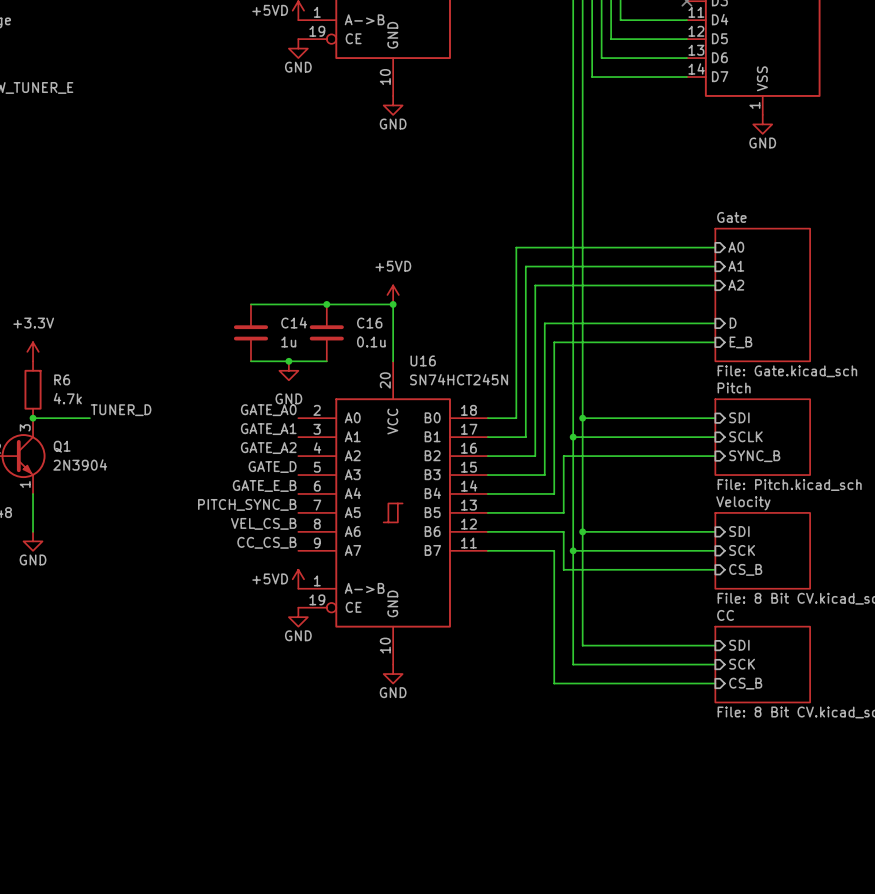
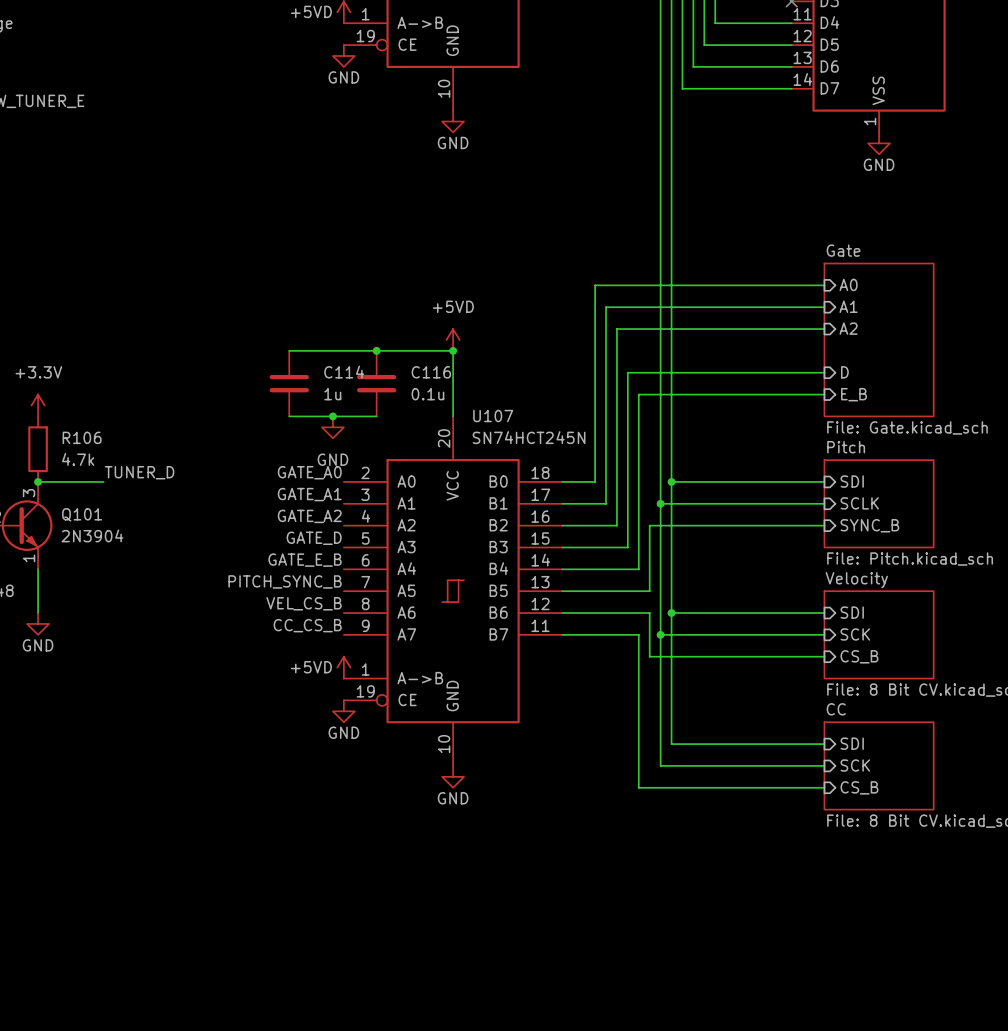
C14 name: C14 (294, 322) -> C114 (344, 372)
C16 name: C16 (369, 323) -> C116 (431, 372)
U16 name: U16 (423, 360) -> U107 (493, 416)
R6 name: R6 (62, 379) -> R106 (82, 437)
Q1 name: Q1 (62, 446) -> Q101 (82, 514)

